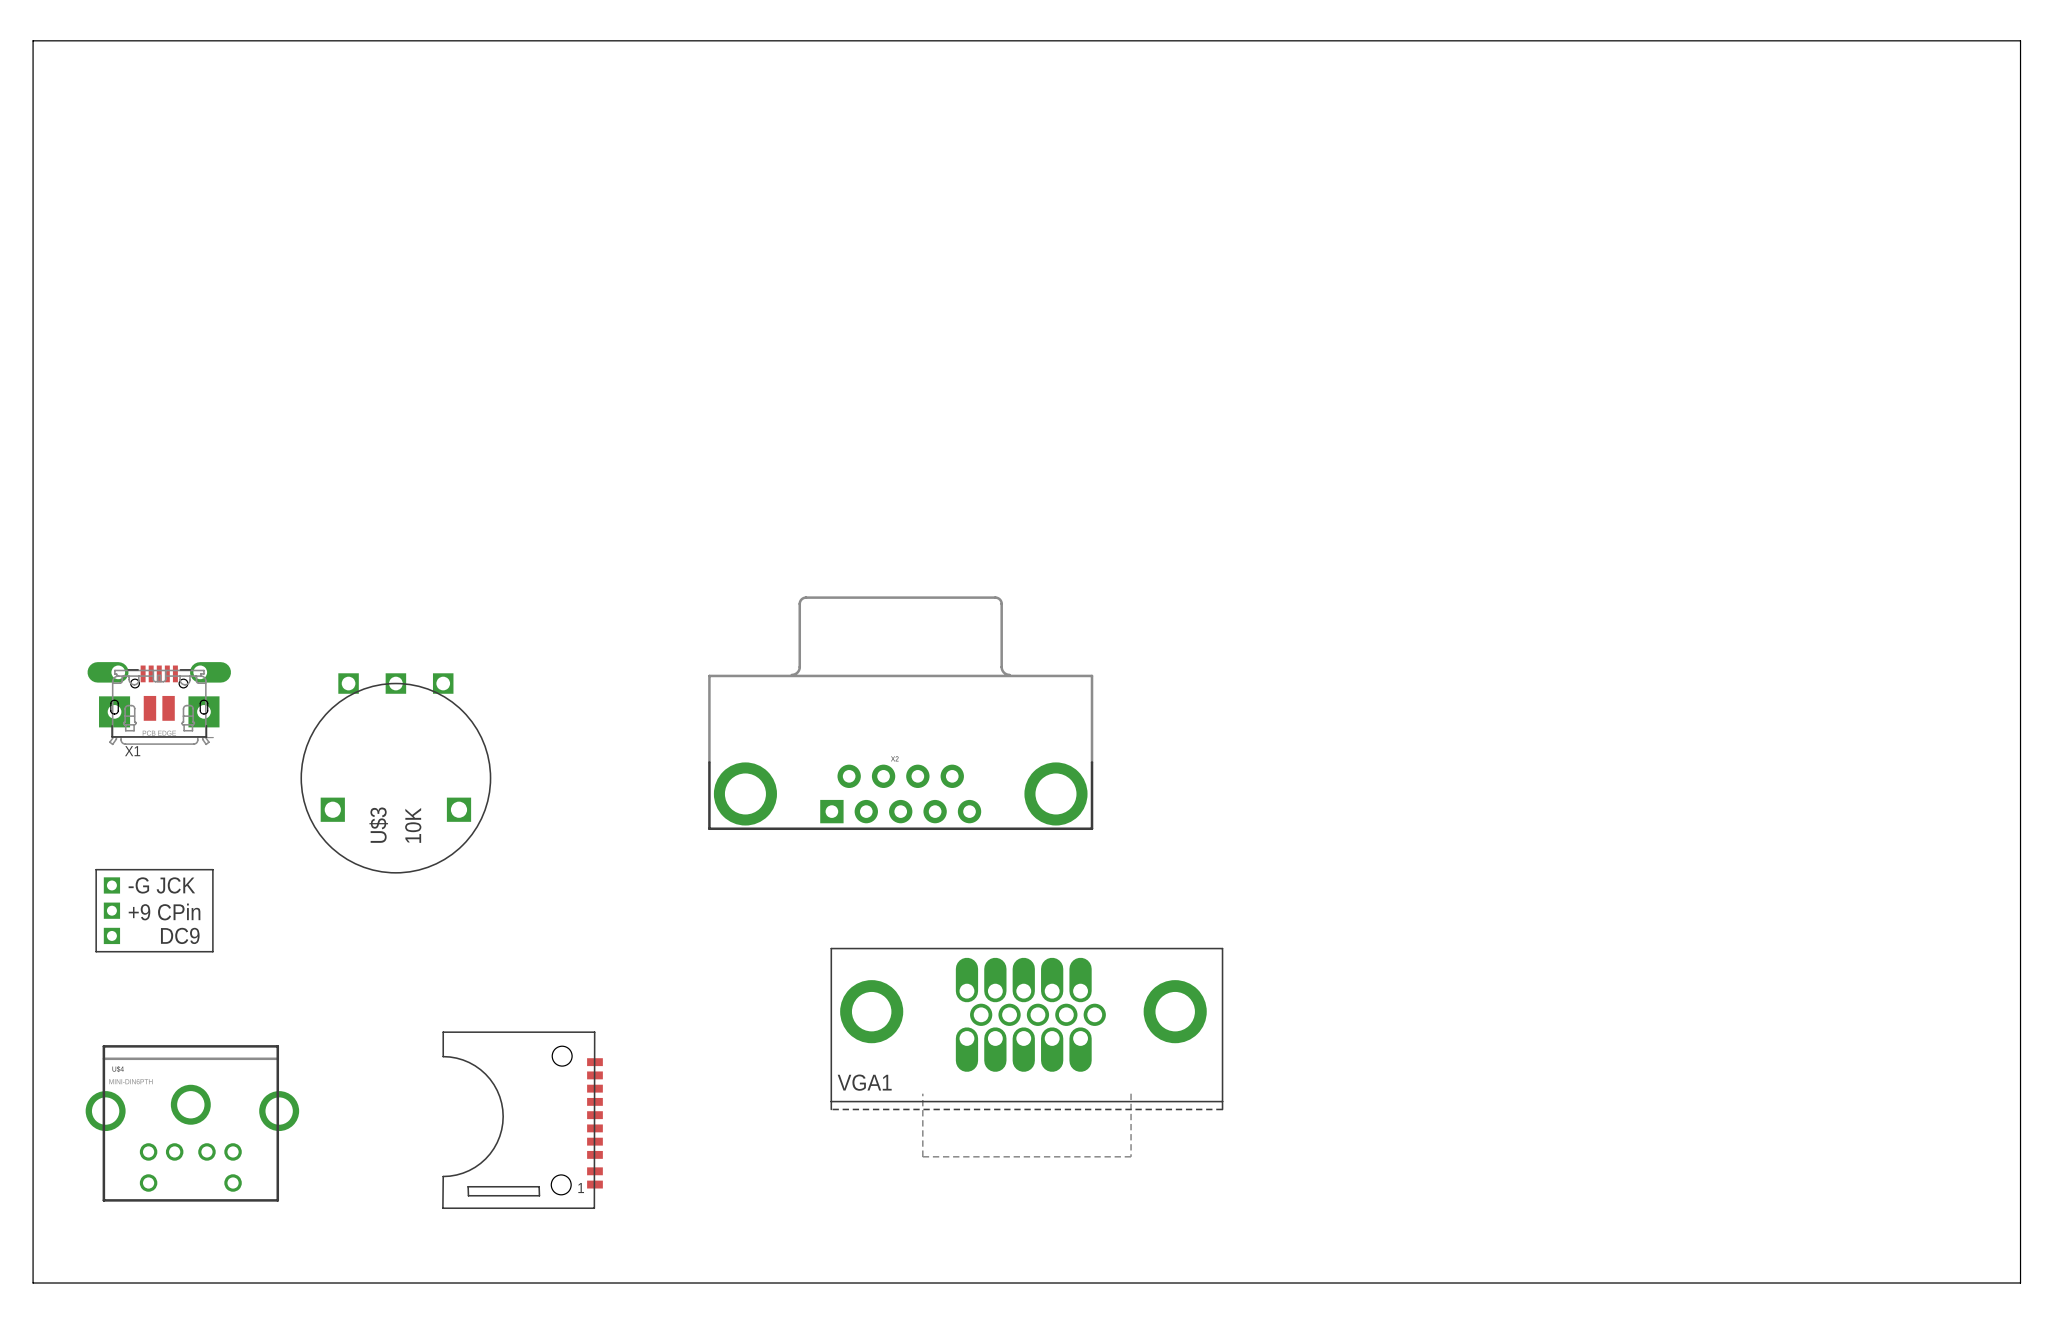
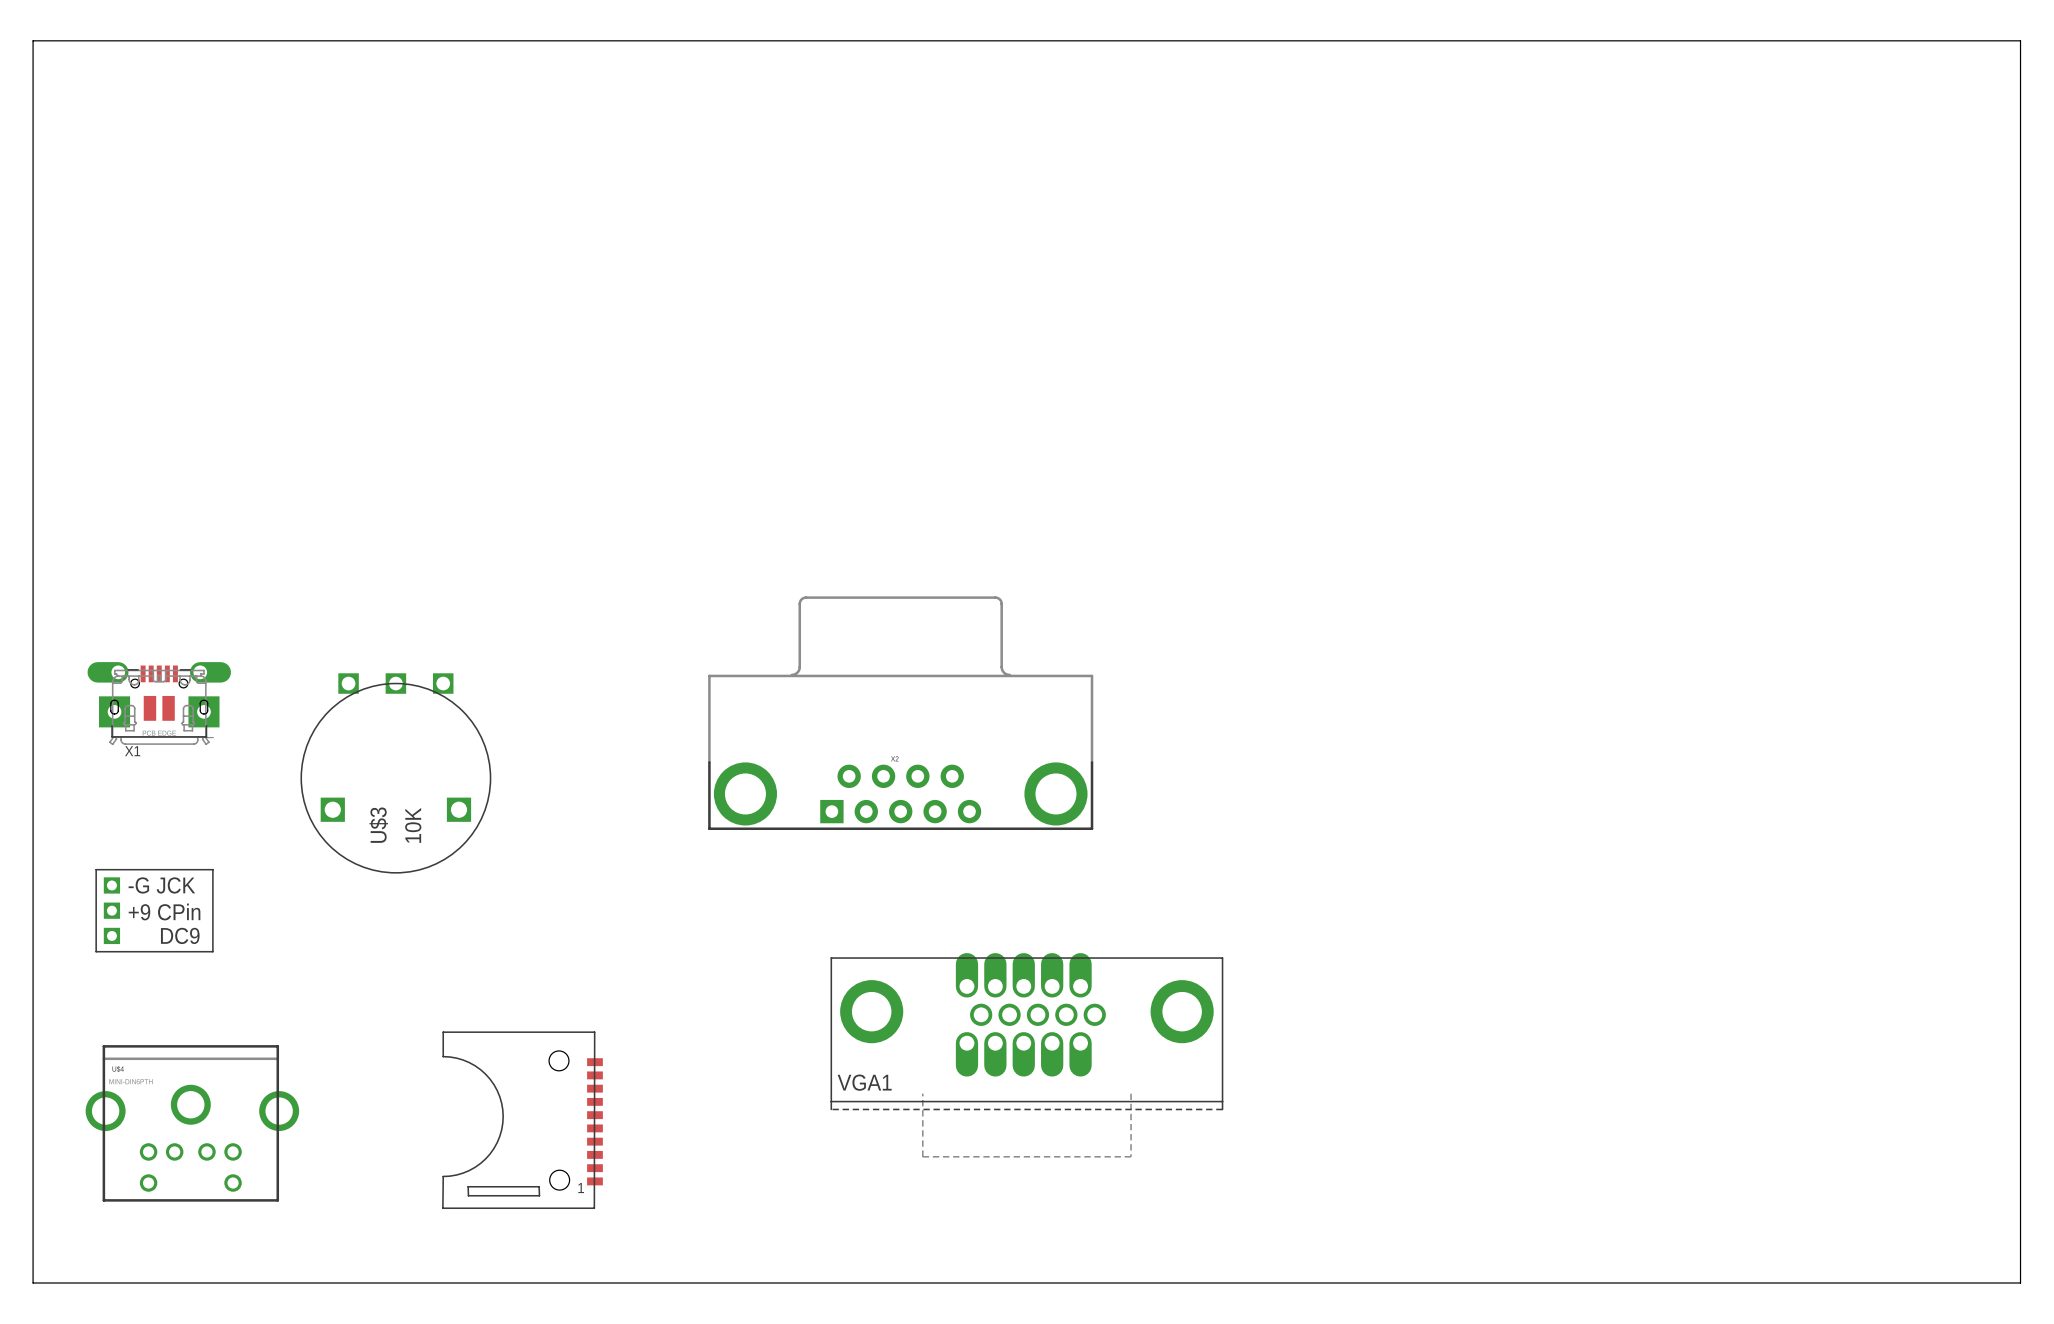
VGA1 footprint: [830, 947, 1224, 1158] -> [830, 953, 1224, 1158]
part footprint: [442, 1031, 603, 1210] -> [442, 1031, 603, 1210]

